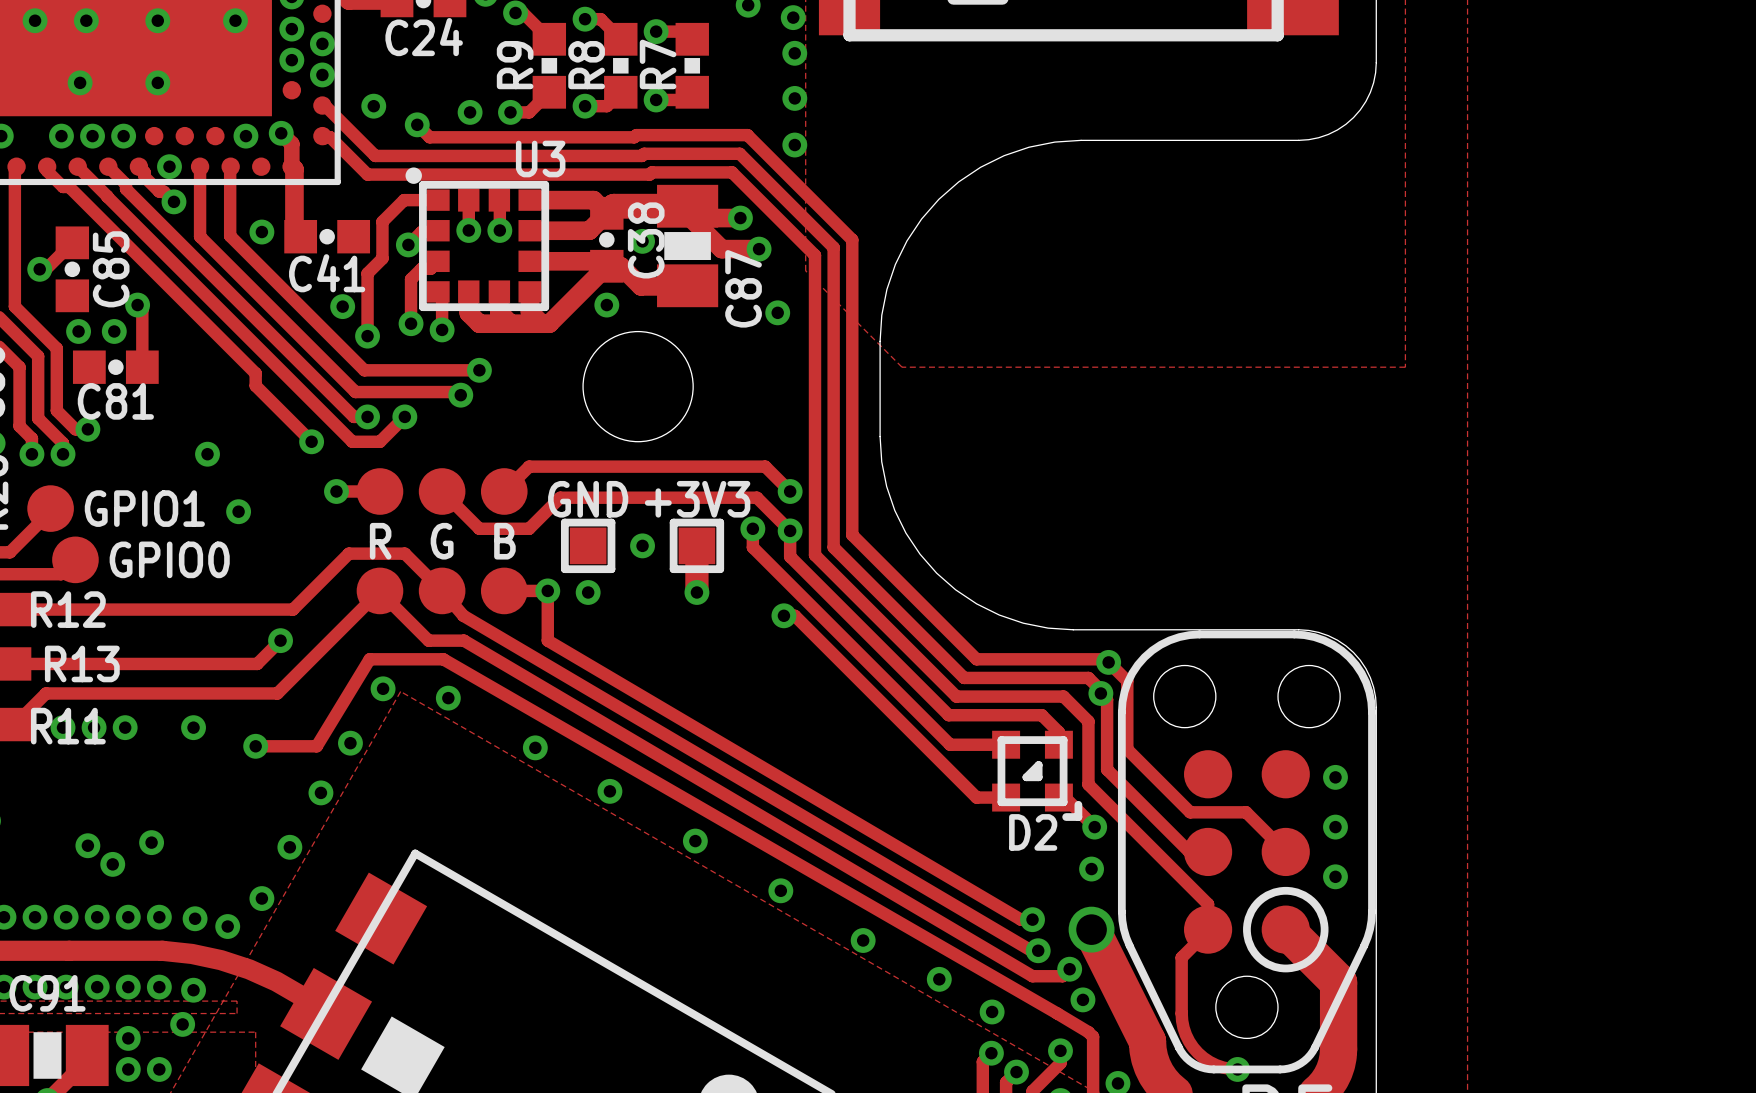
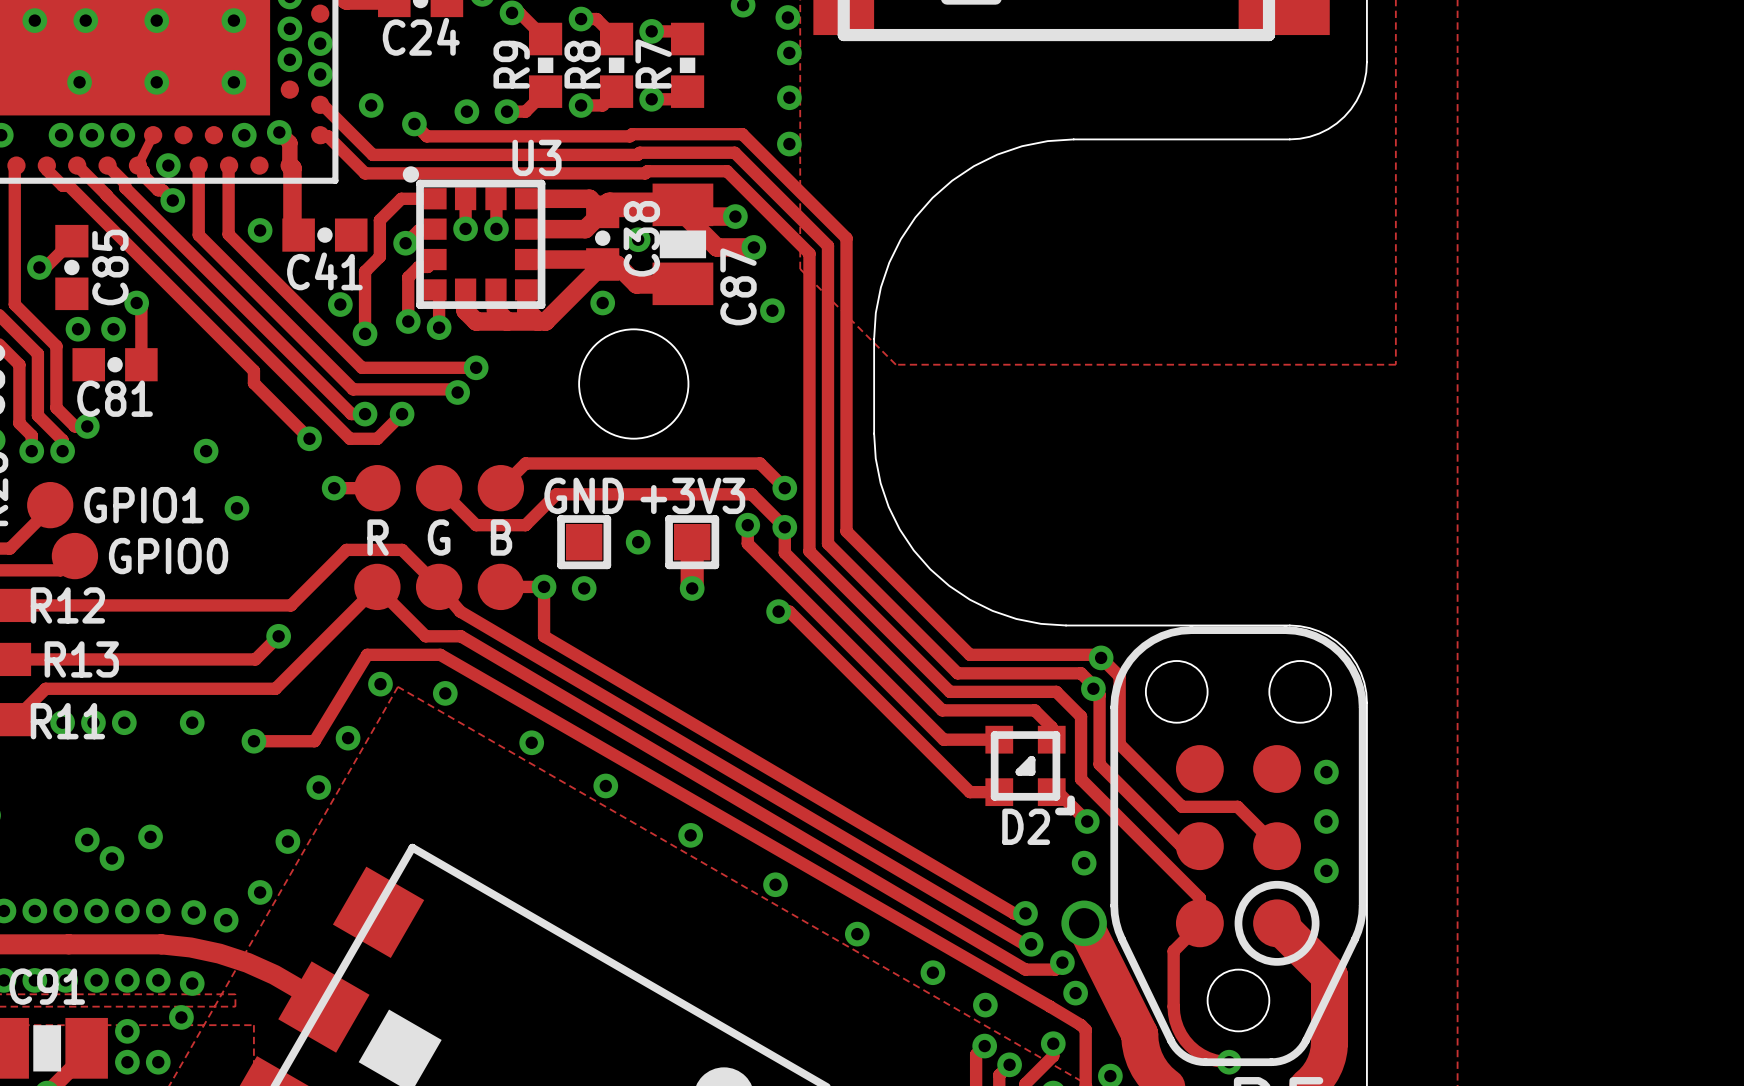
via: none -> (233, 82)
track: none -> (153, 135) (137, 165)

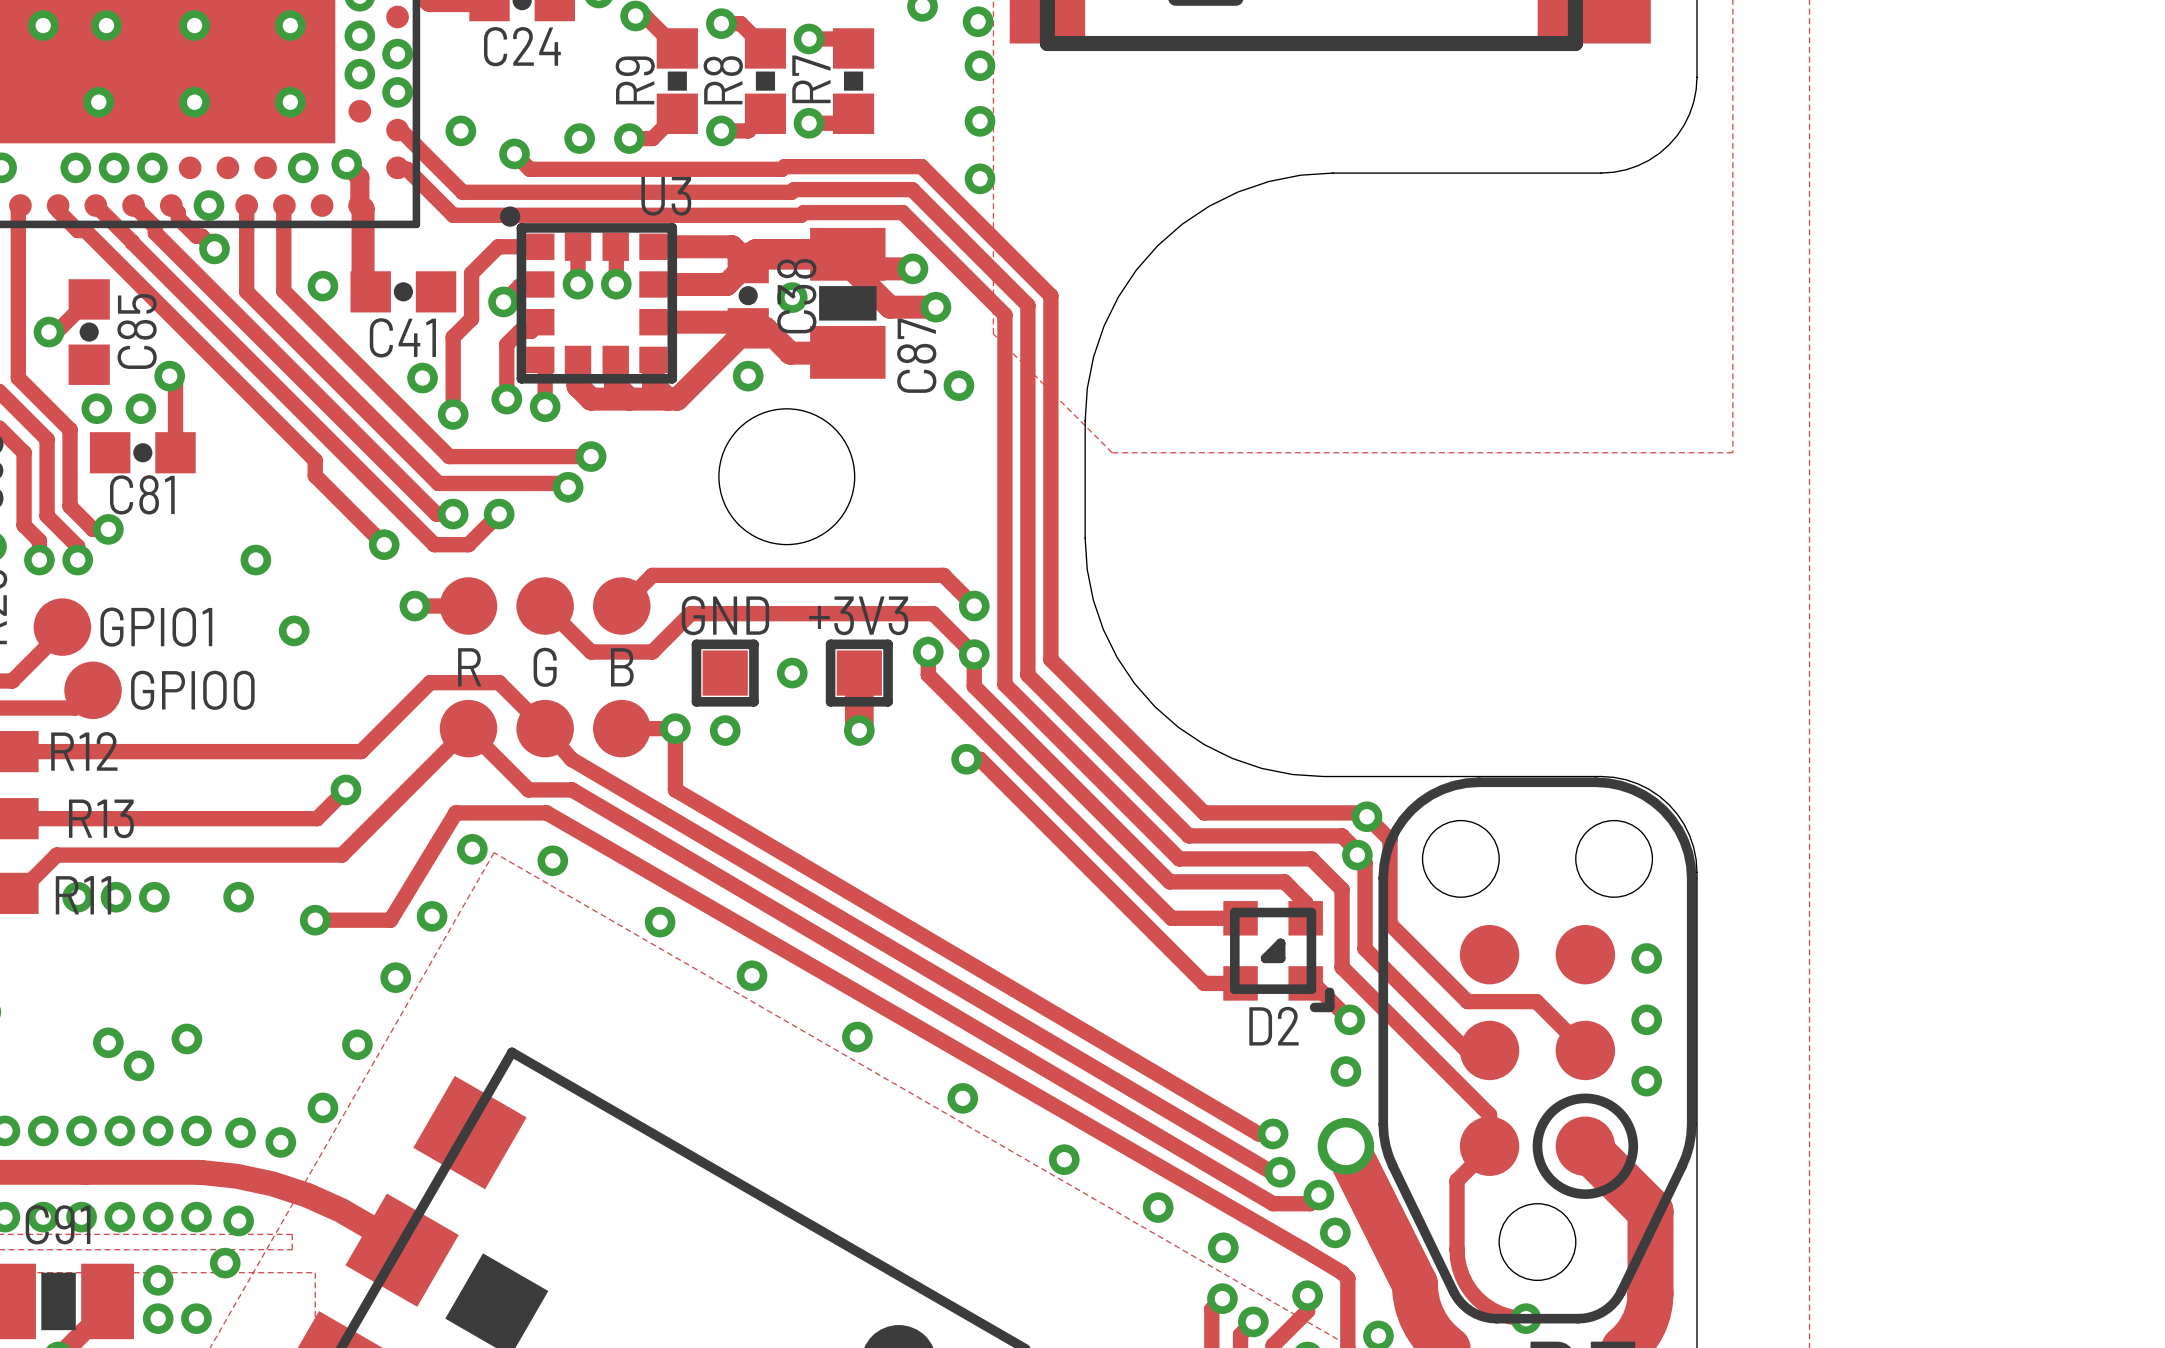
track: (153, 135) (137, 165) -> none

